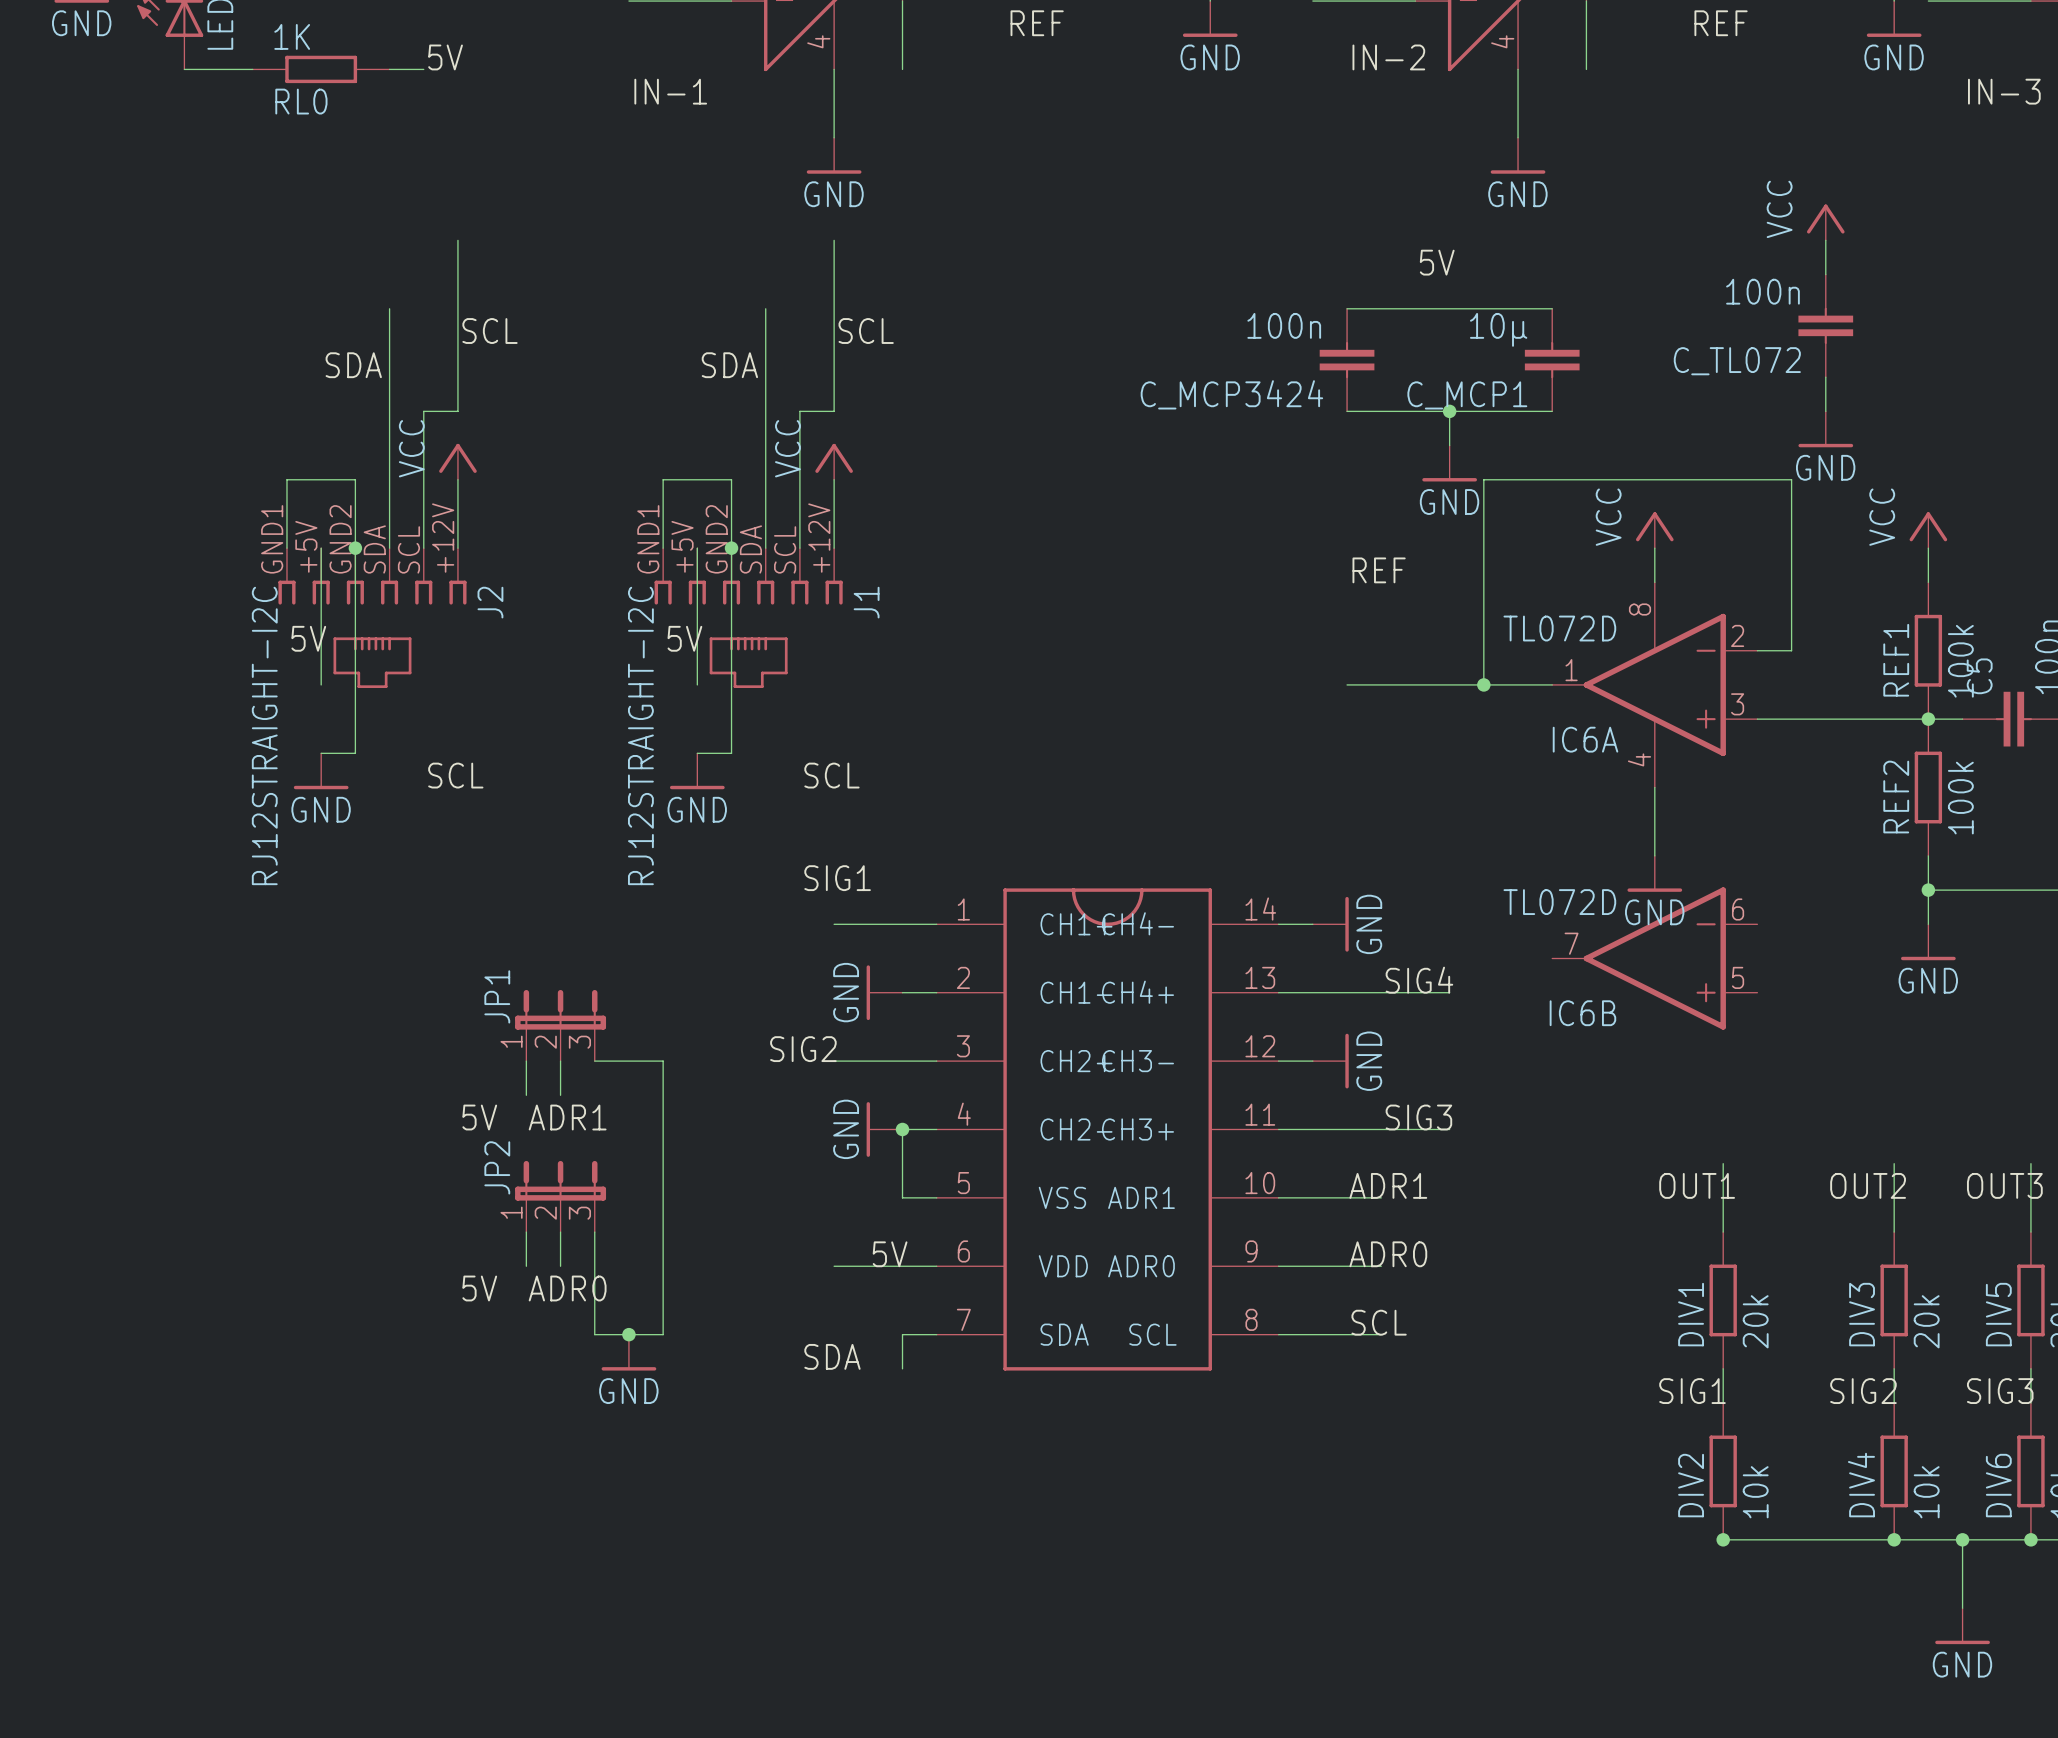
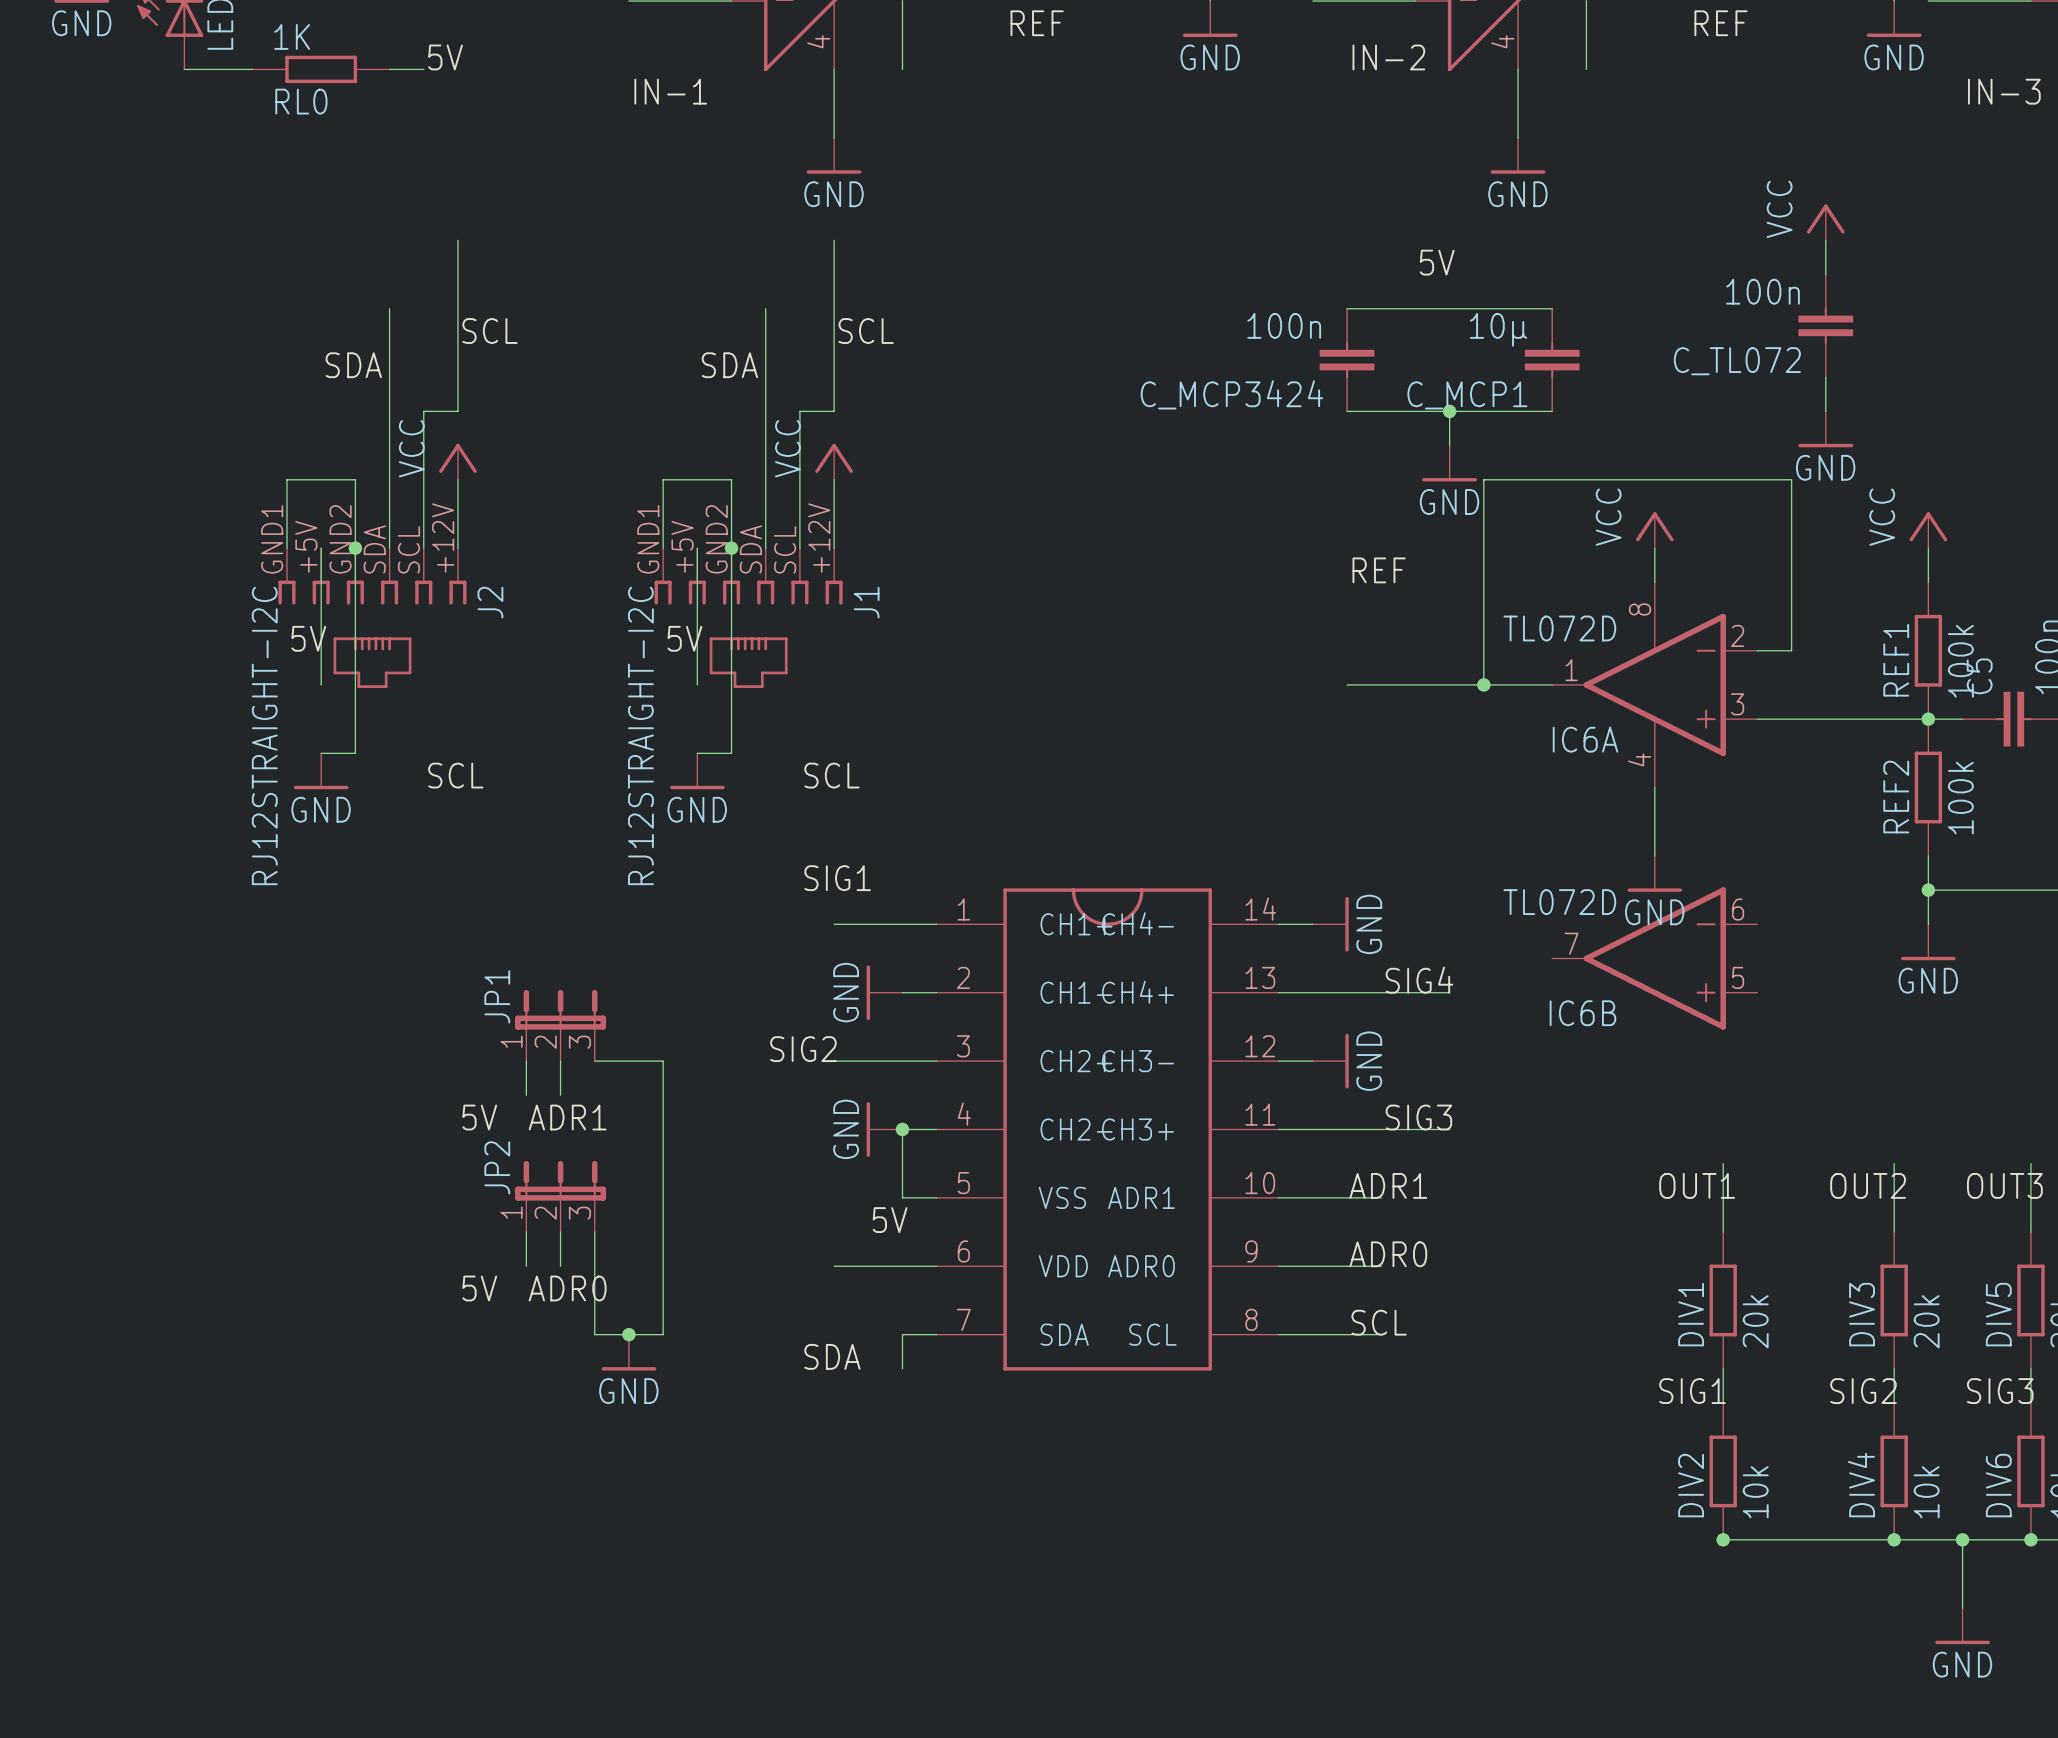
label position: 5V (890, 1254) -> 5V (890, 1220)

